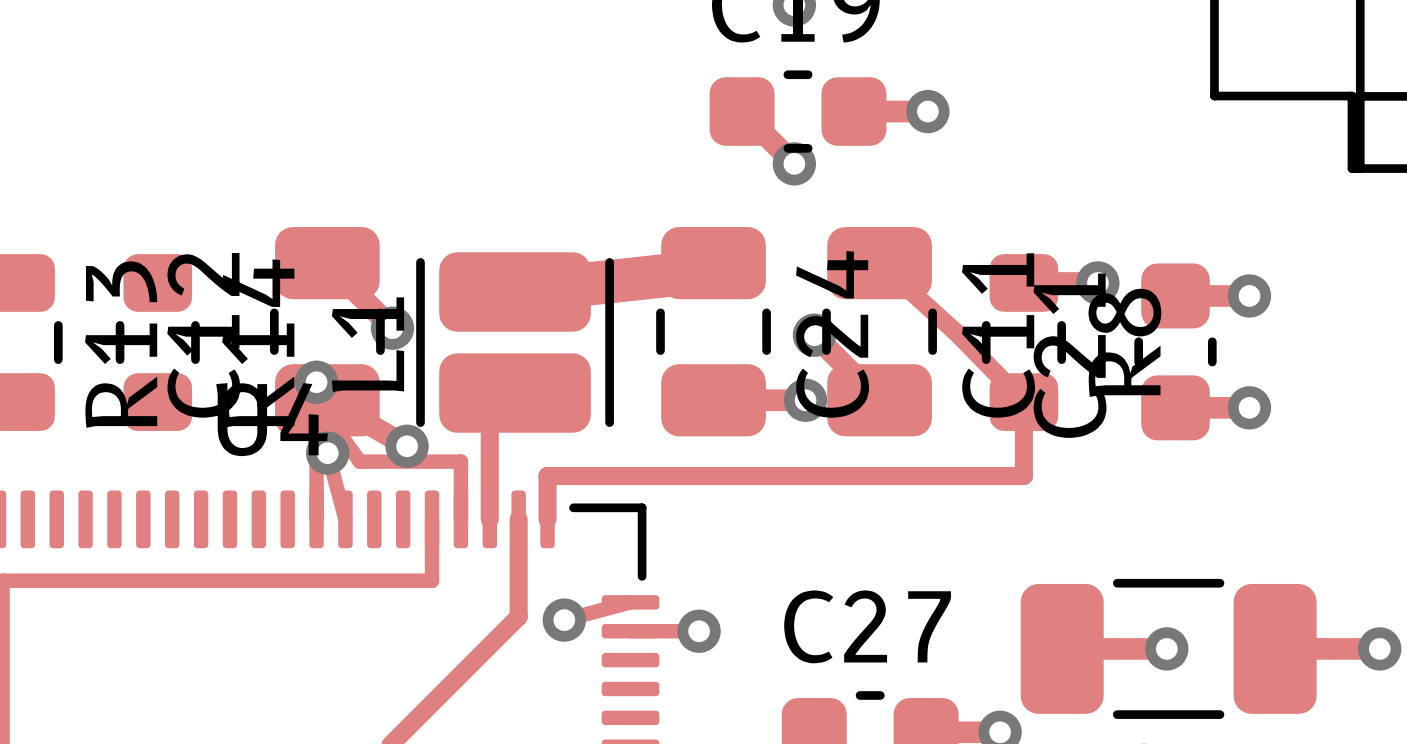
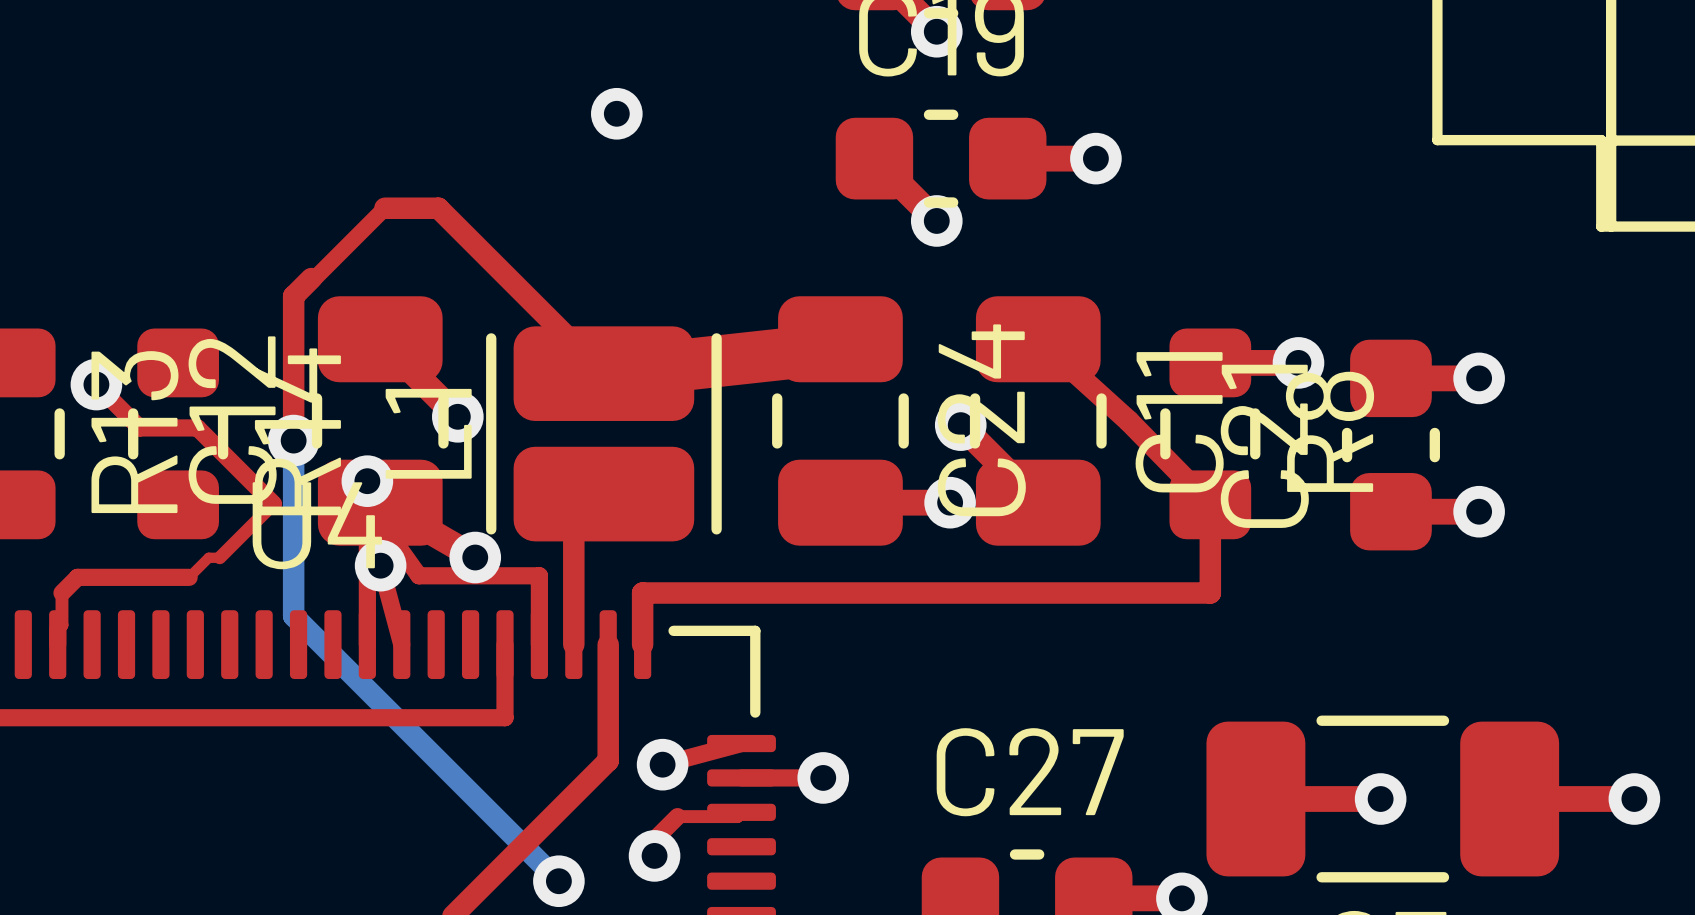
via: none -> (616, 113)
top track: none -> (603, 373) (438, 208) (384, 208) (314, 278) (311, 278) (293, 296) (293, 440)
top track: none -> (96, 384) (139, 427) (197, 427) (273, 503) (219, 557) (208, 557) (189, 577) (77, 577) (61, 592) (61, 625) (57, 629) (57, 644)
via: none -> (96, 384)
bottom track: none -> (293, 440) (293, 615) (558, 881)
via: none -> (293, 440)
top track: none -> (741, 812) (737, 816) (677, 816) (654, 839) (654, 855)
via: none -> (654, 855)
via: none -> (558, 881)

